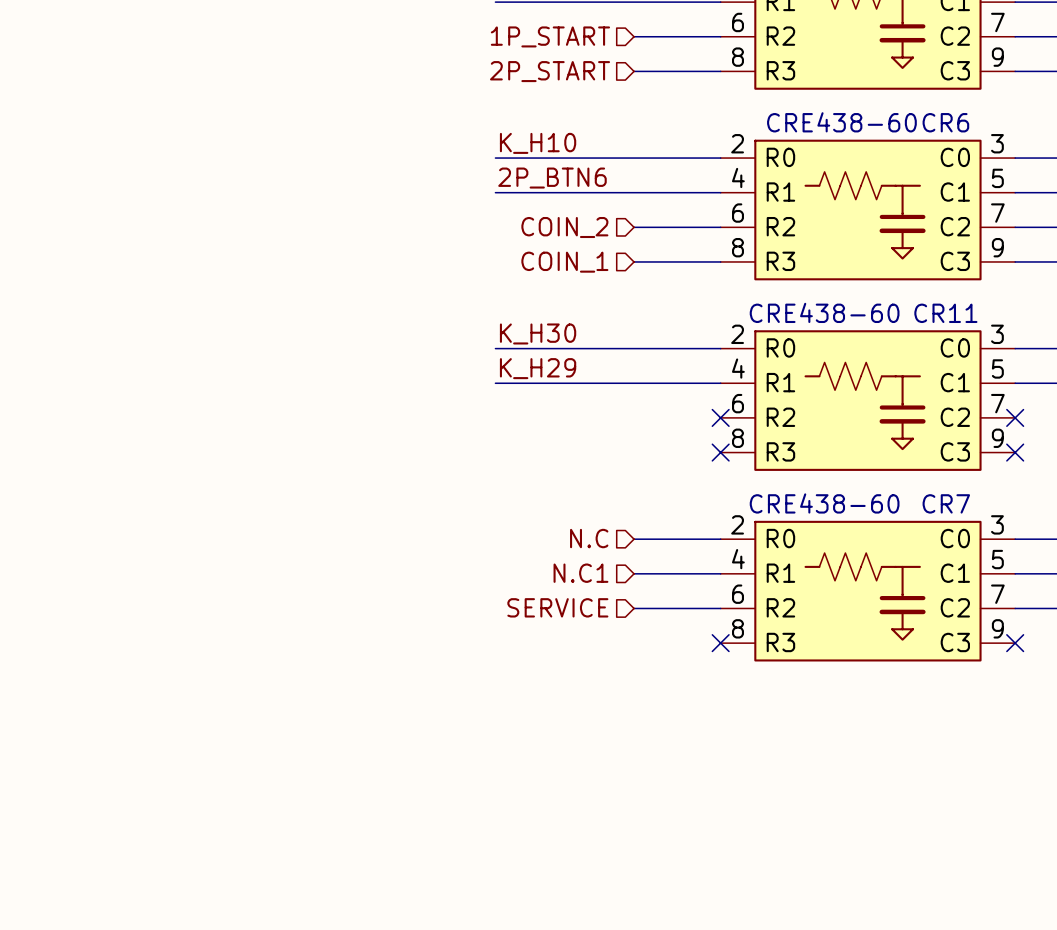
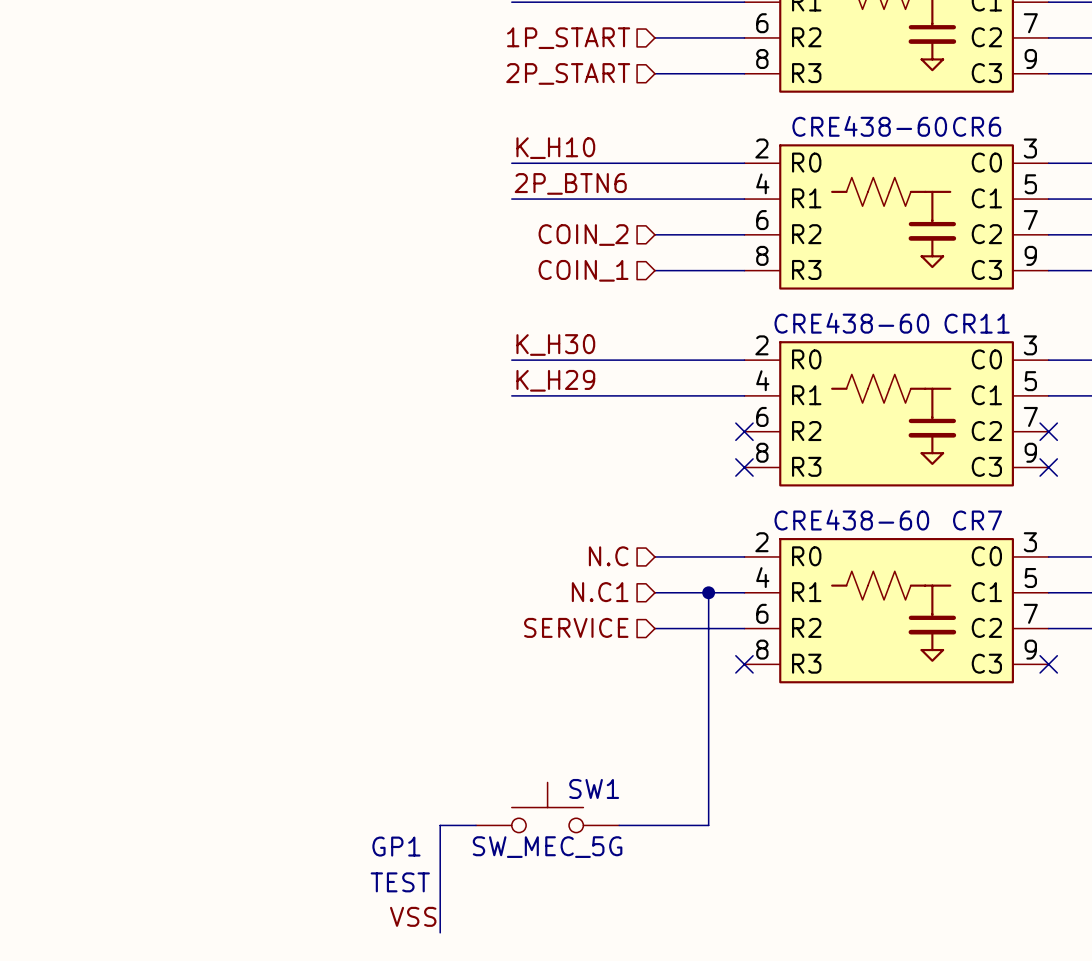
wire: none -> (708, 592) (708, 825) (619, 825)
junction: none -> (708, 592)
SW1: none -> SW_MEC_5G (547, 807)
wire: none -> (476, 825) (440, 825) (440, 932)
text: none -> GP1 (396, 846)
text: none -> TEST (400, 882)
label: none -> VSS (413, 916)

